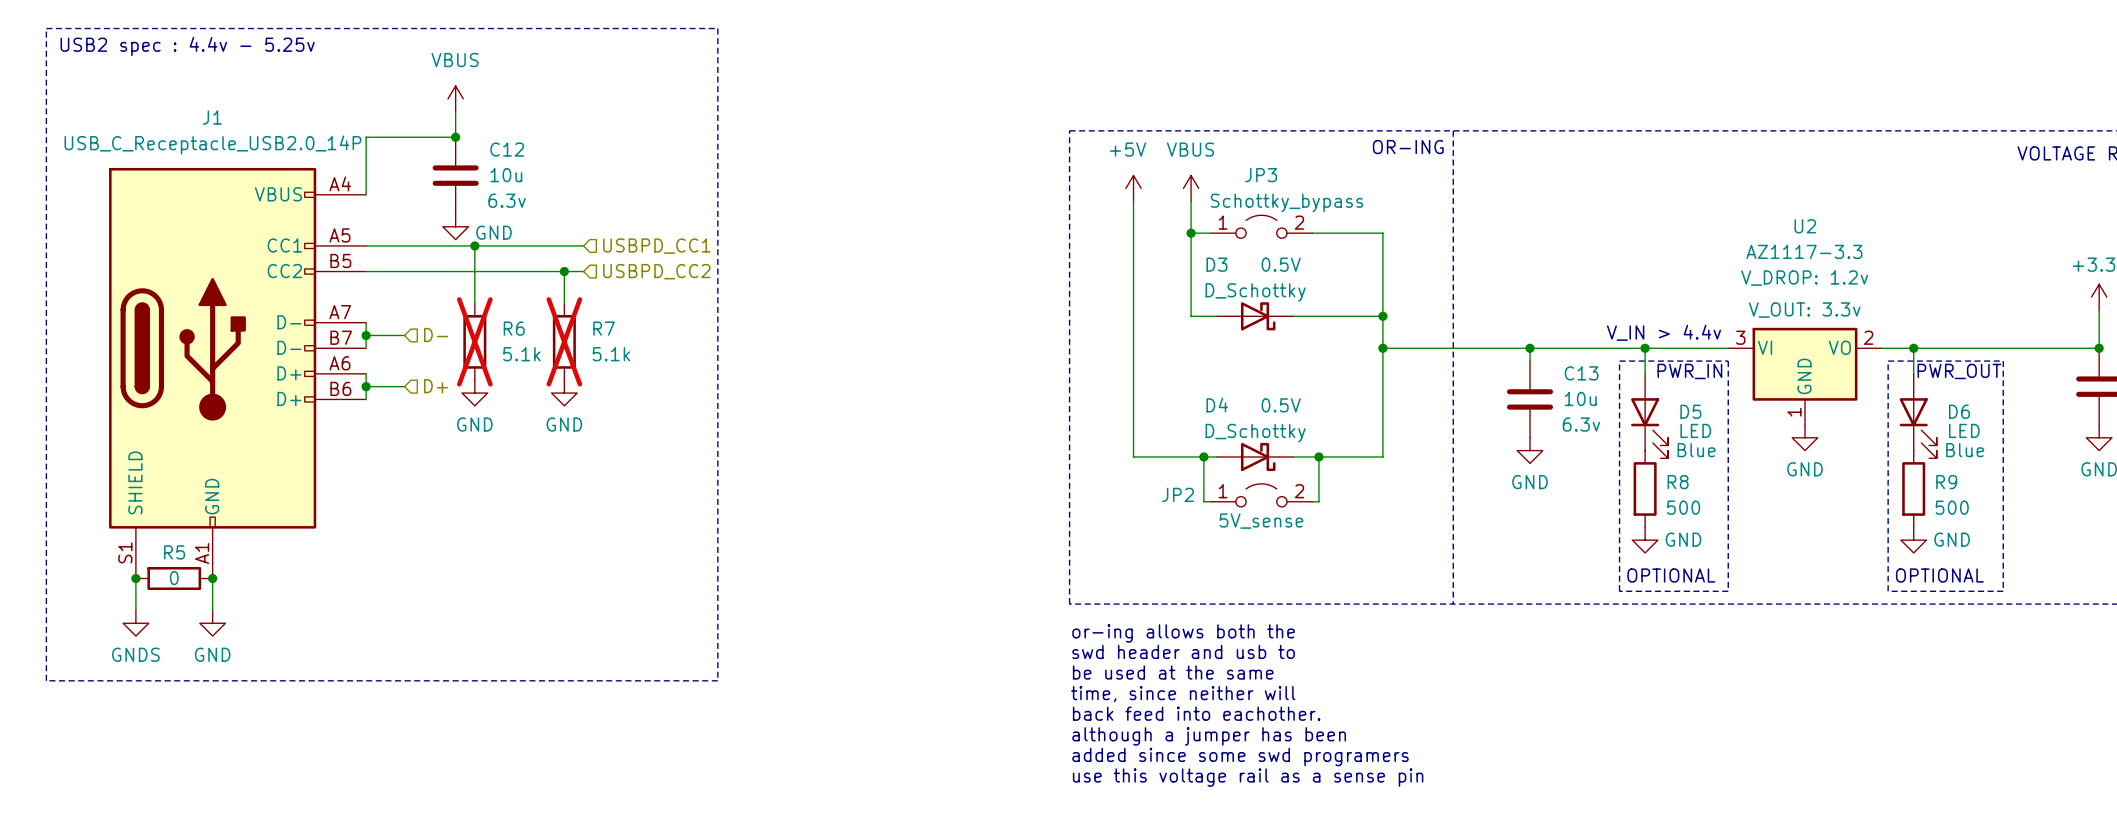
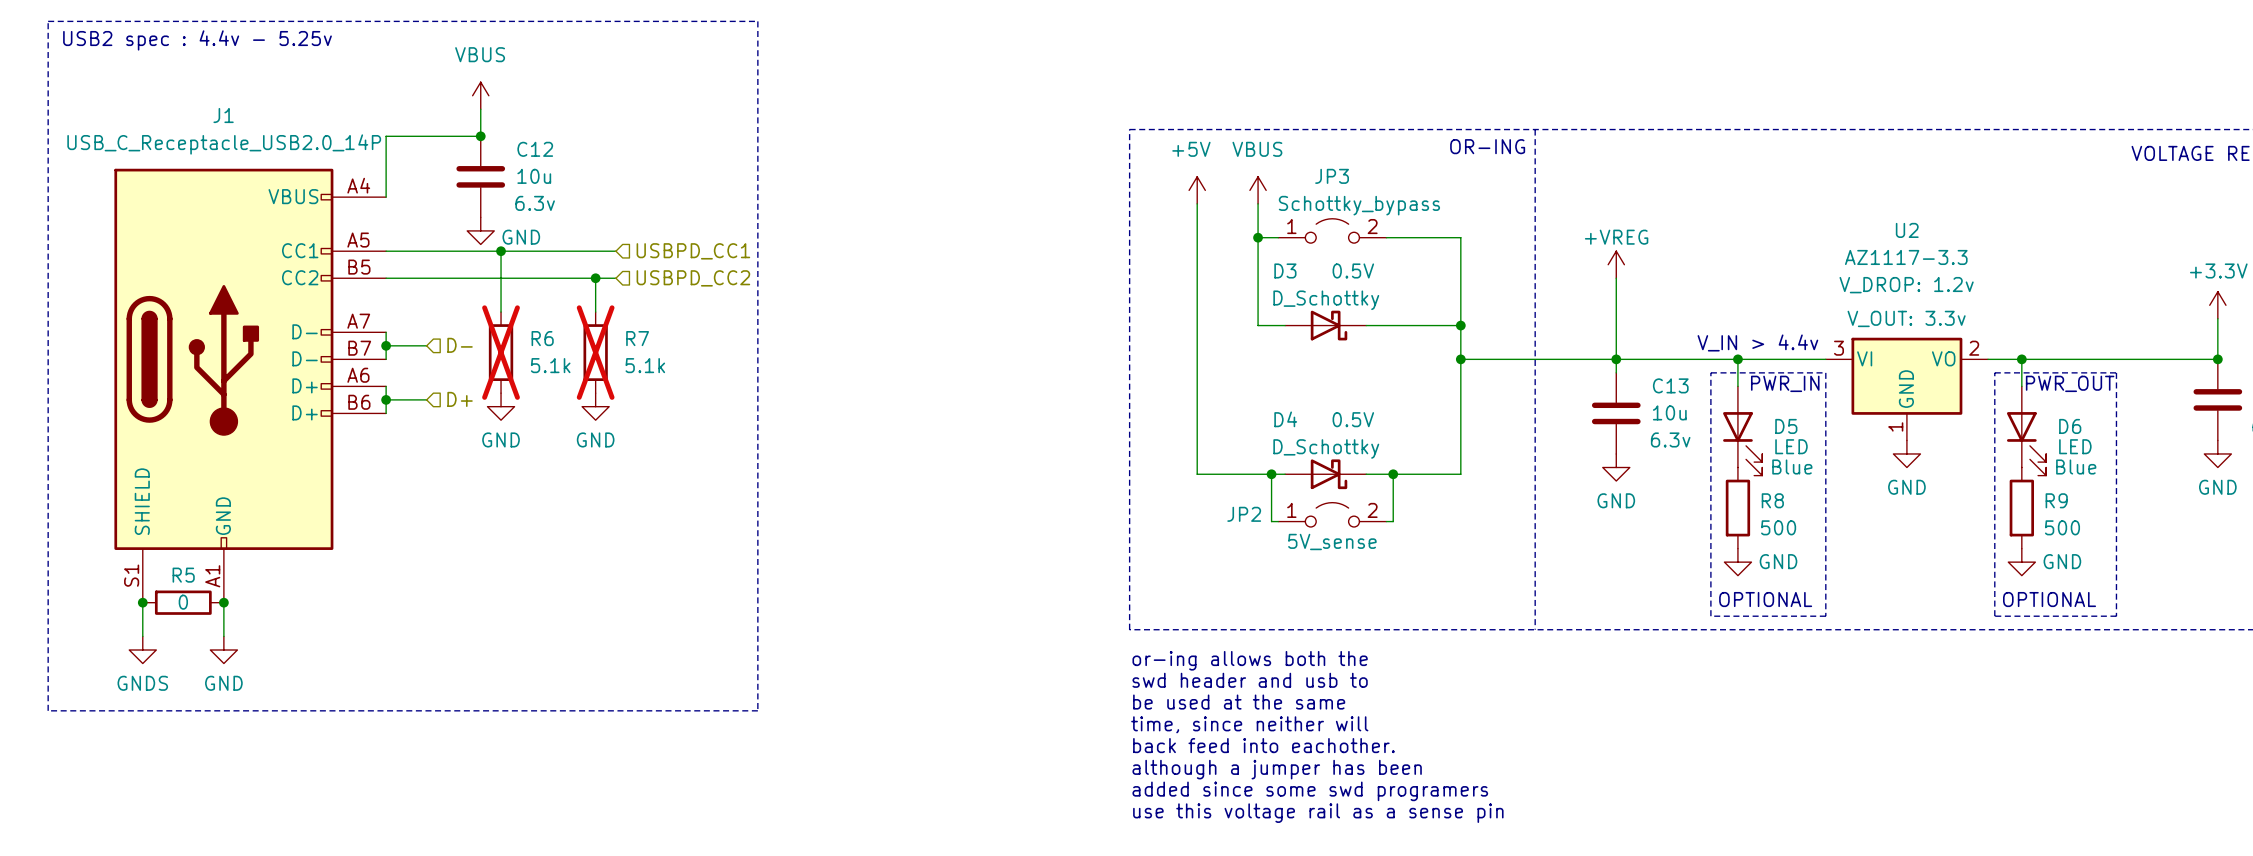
power symbol: none -> +VREG (1616, 264)
wire: none -> (1616, 278) (1616, 359)

